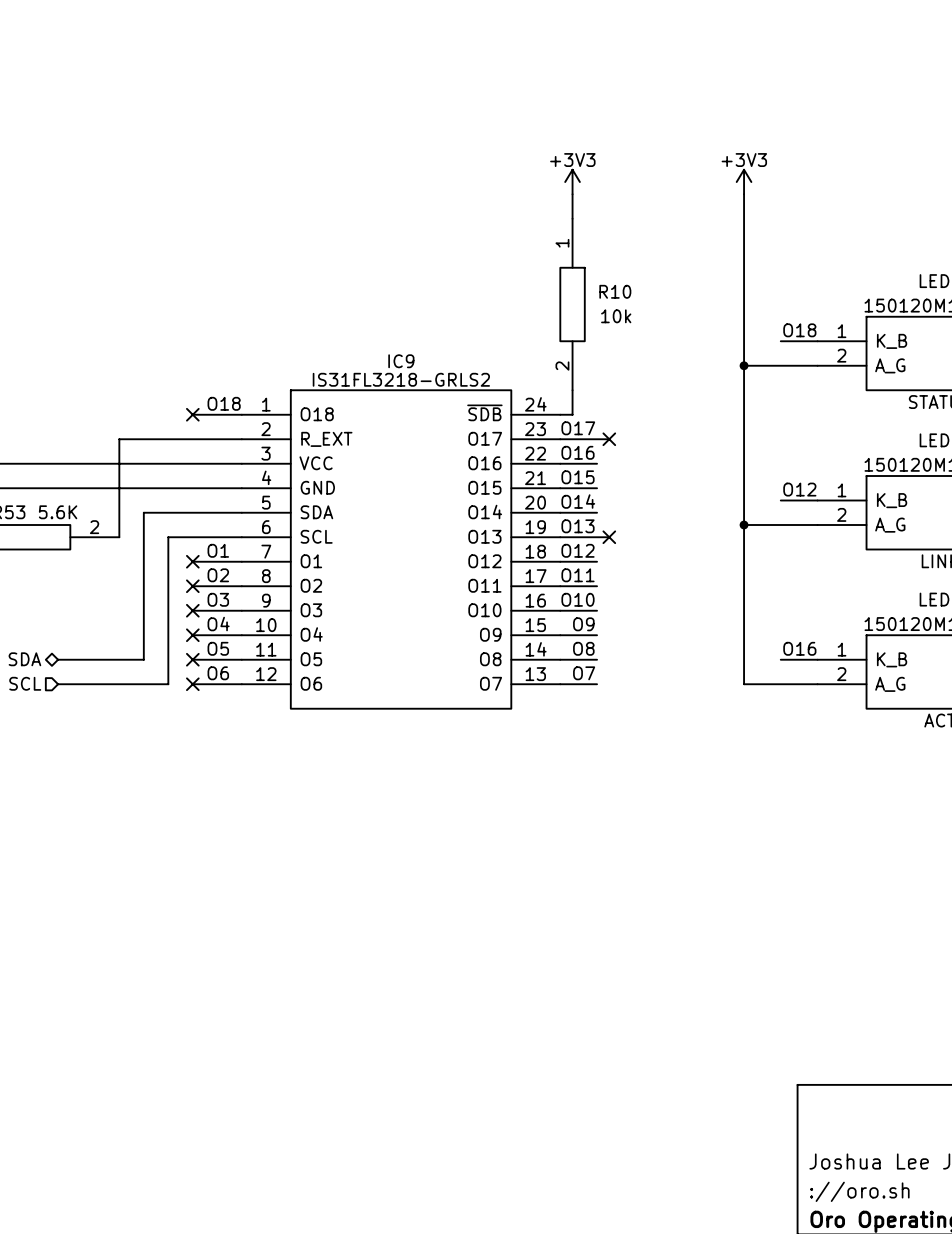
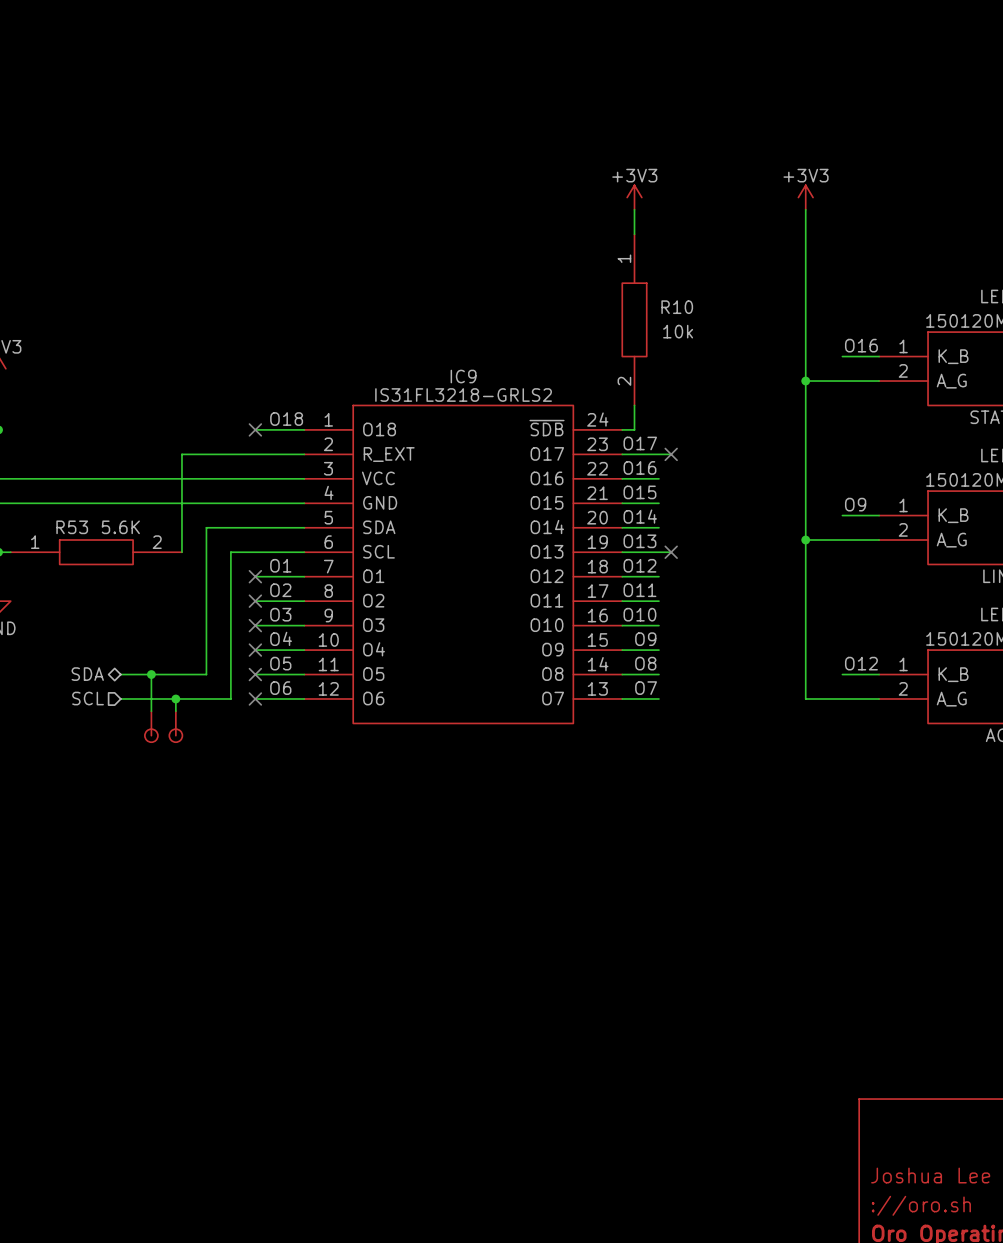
label: O18 (799, 330) -> O16 (861, 345)
label: O12 (799, 489) -> O9 (855, 504)
label: O16 (799, 648) -> O12 (861, 663)
wire: none -> (151, 674) (151, 711)
junction: none -> (151, 674)
wire: none -> (175, 698) (175, 711)
junction: none -> (175, 698)
part: none -> (151, 726)
part: none -> (175, 726)

